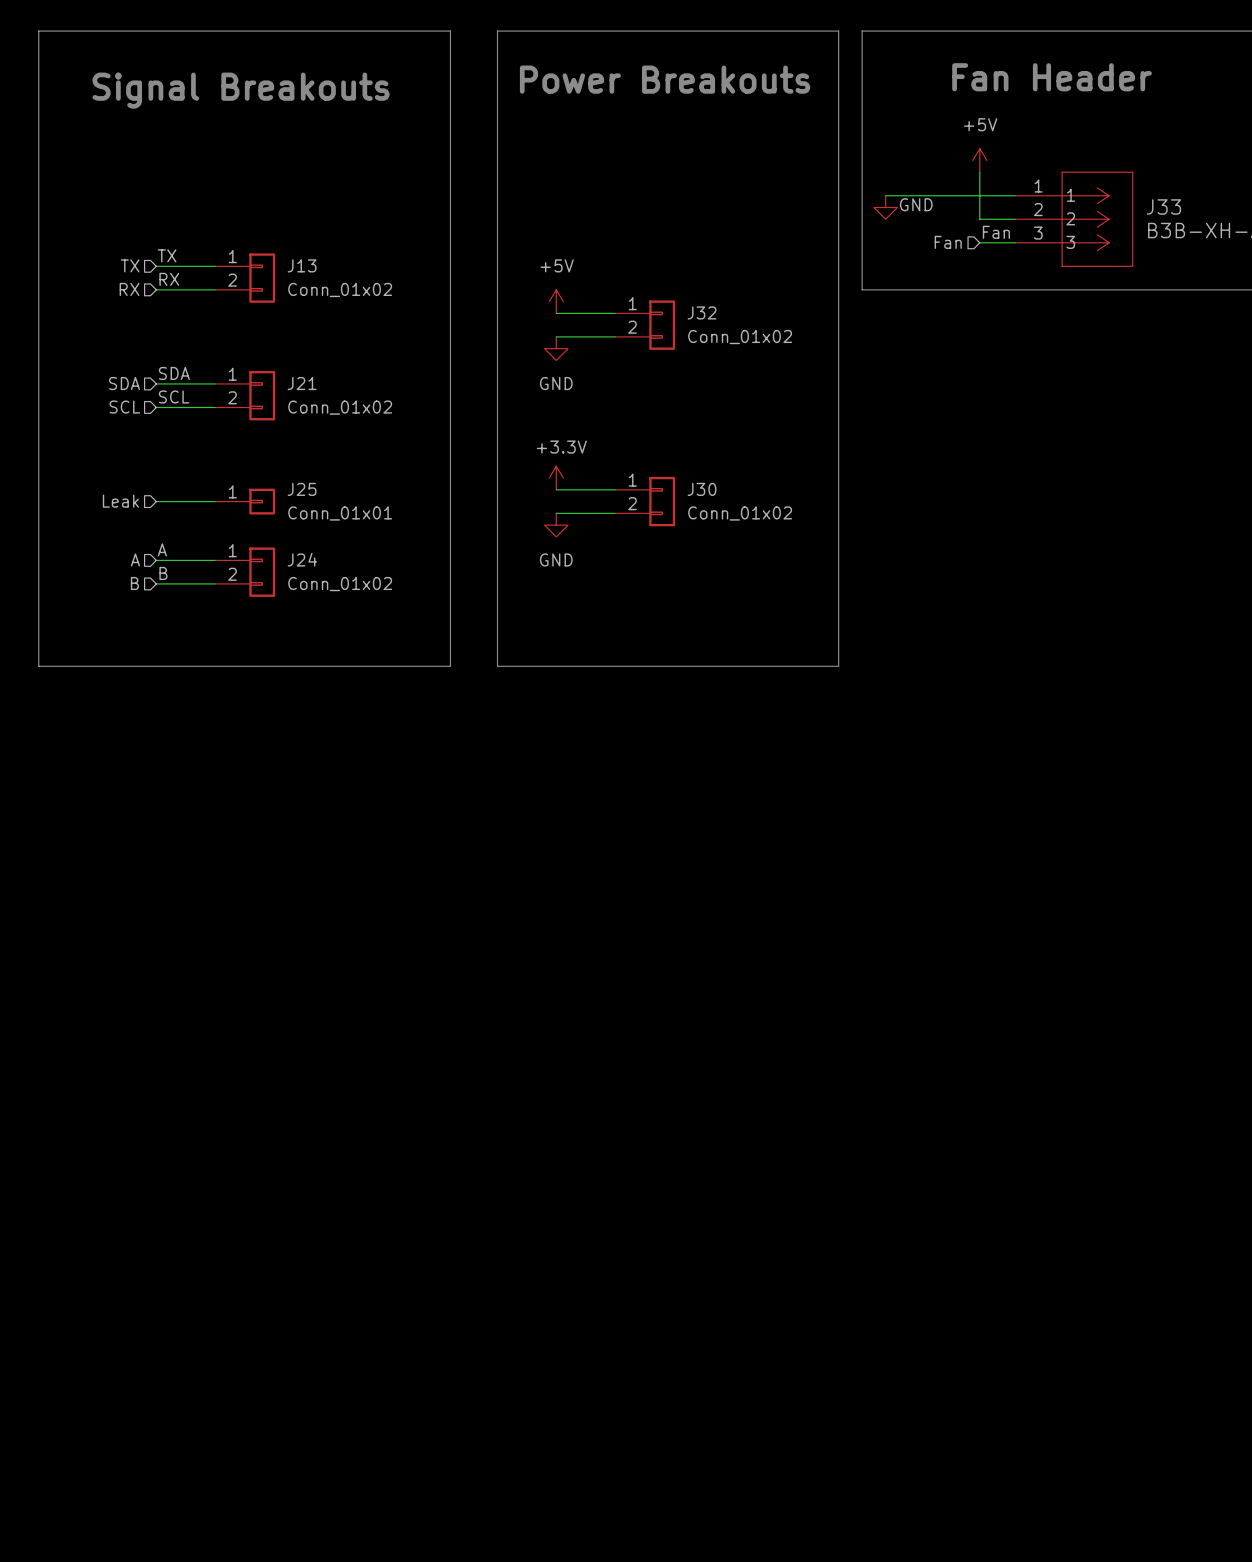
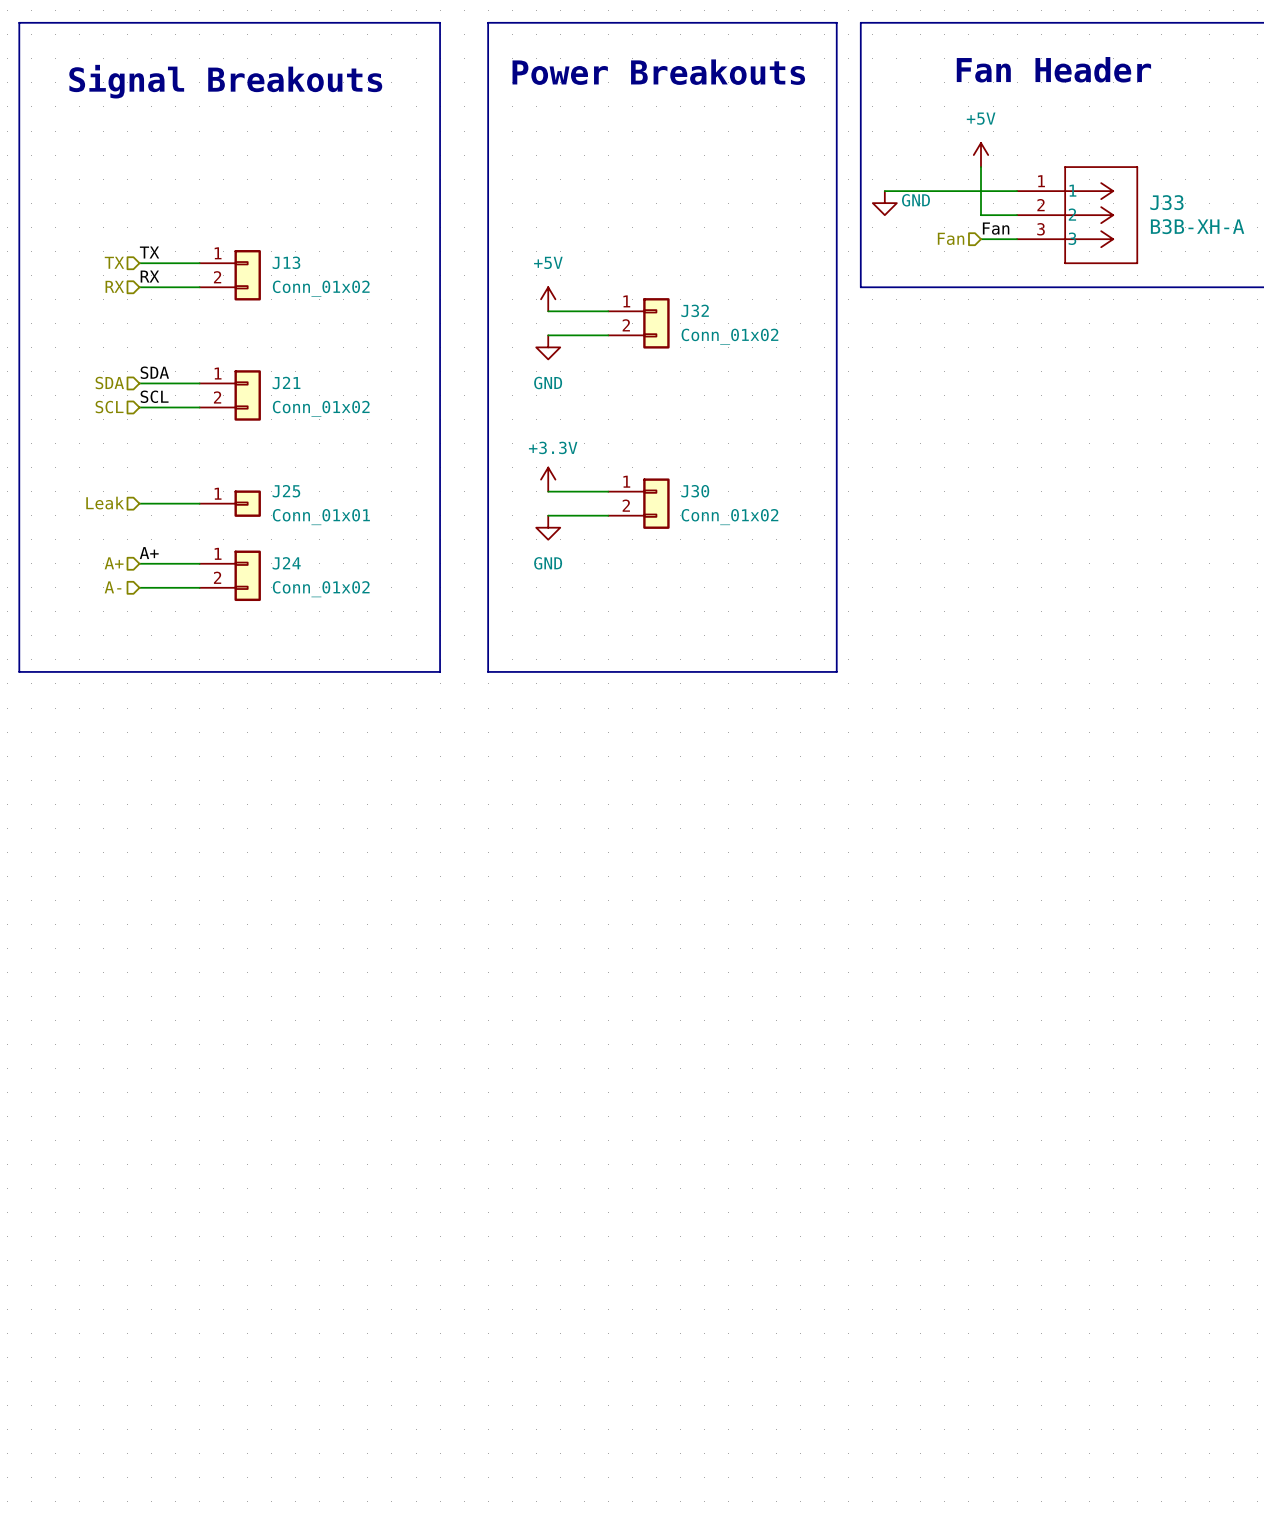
label: A (162, 549) -> A+ (149, 553)
hierarchical label: A (135, 559) -> A+ (114, 563)
label: B (163, 573) -> none
hierarchical label: B (134, 583) -> A- (113, 587)

